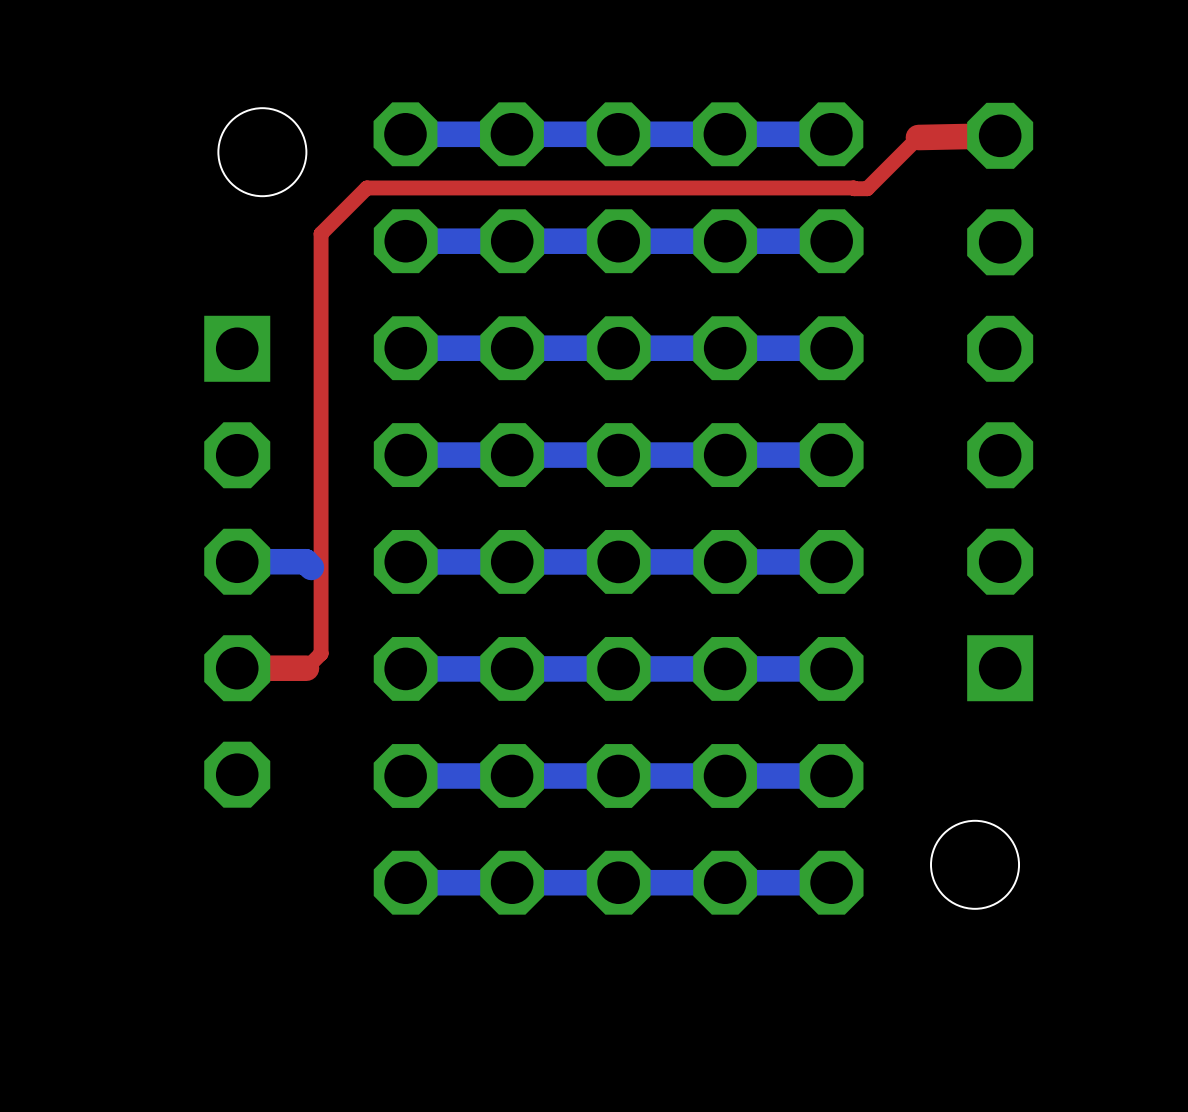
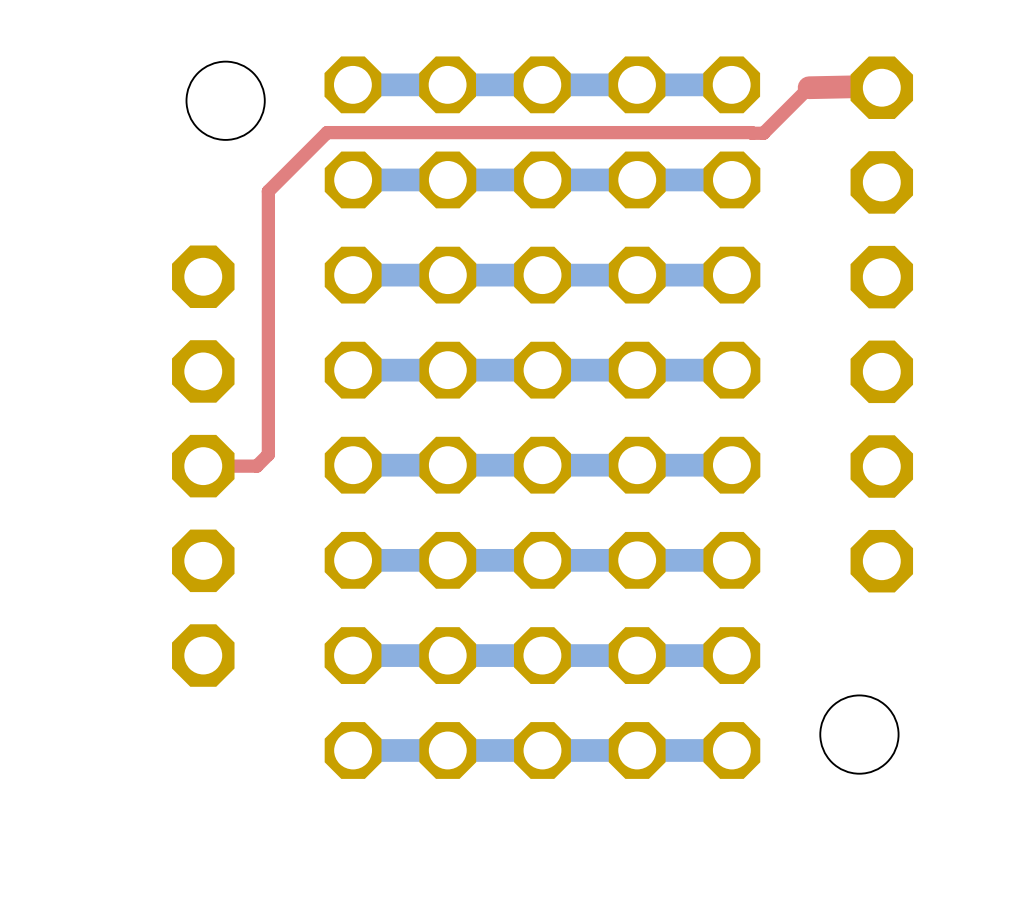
part footprint: [967, 102, 1034, 702] -> [850, 56, 914, 593]
top track: (376, 187) (366, 187) (321, 233) (321, 653) (306, 668) (237, 668) -> (327, 132) (268, 191) (268, 454) (256, 466) (203, 466)
part footprint: [204, 315, 271, 808] -> [172, 245, 235, 687]
bottom track: (237, 561) (305, 561) (311, 567) -> none

